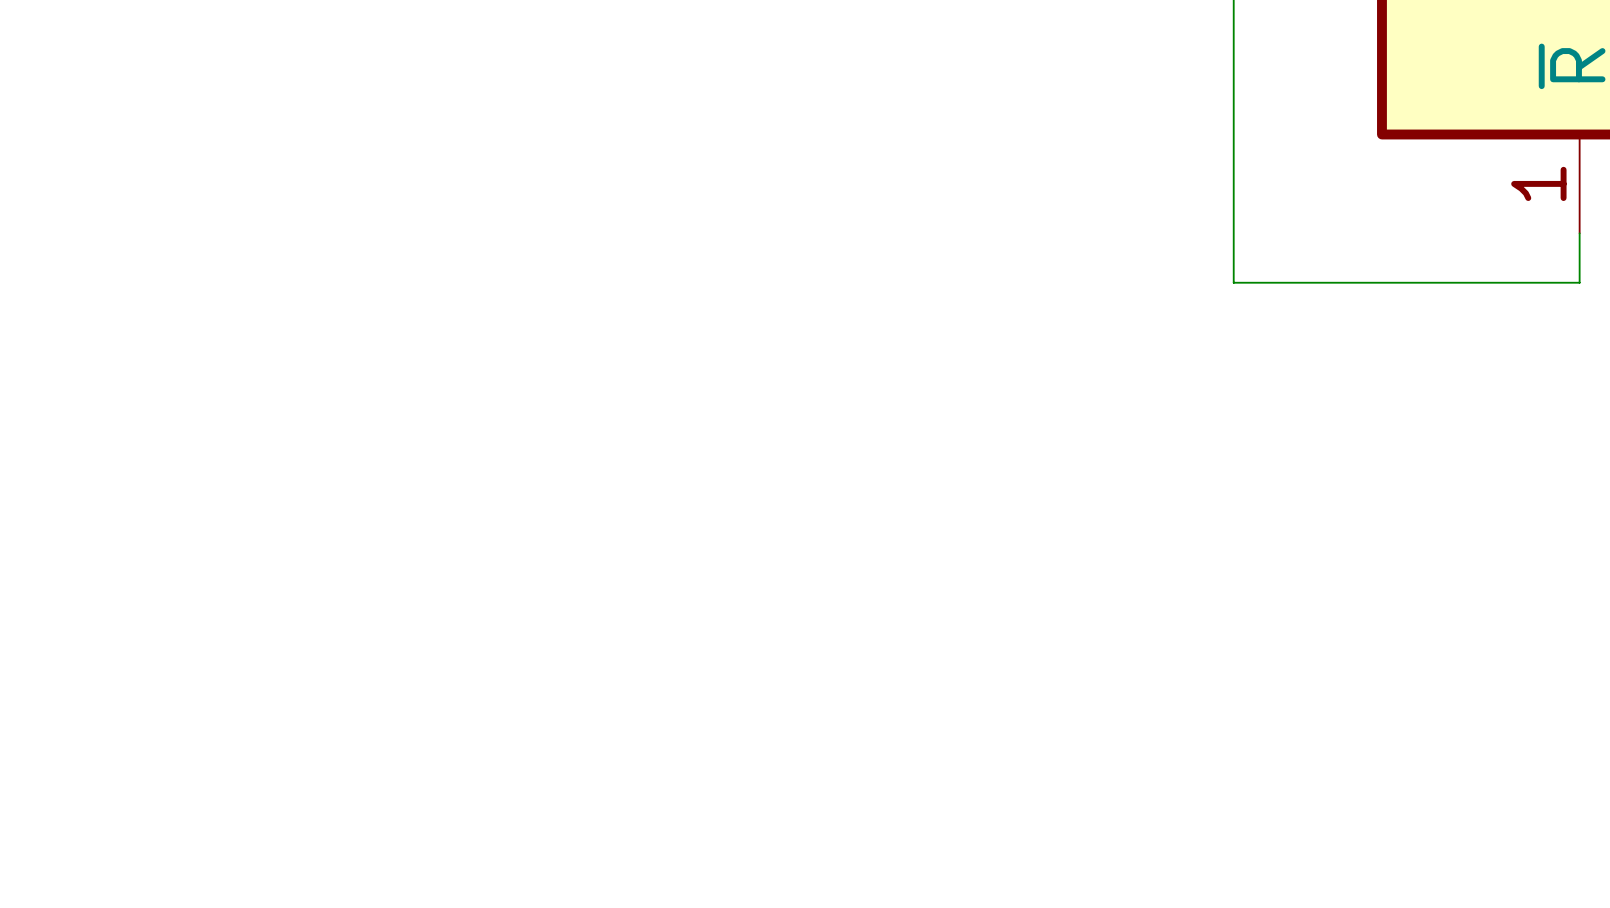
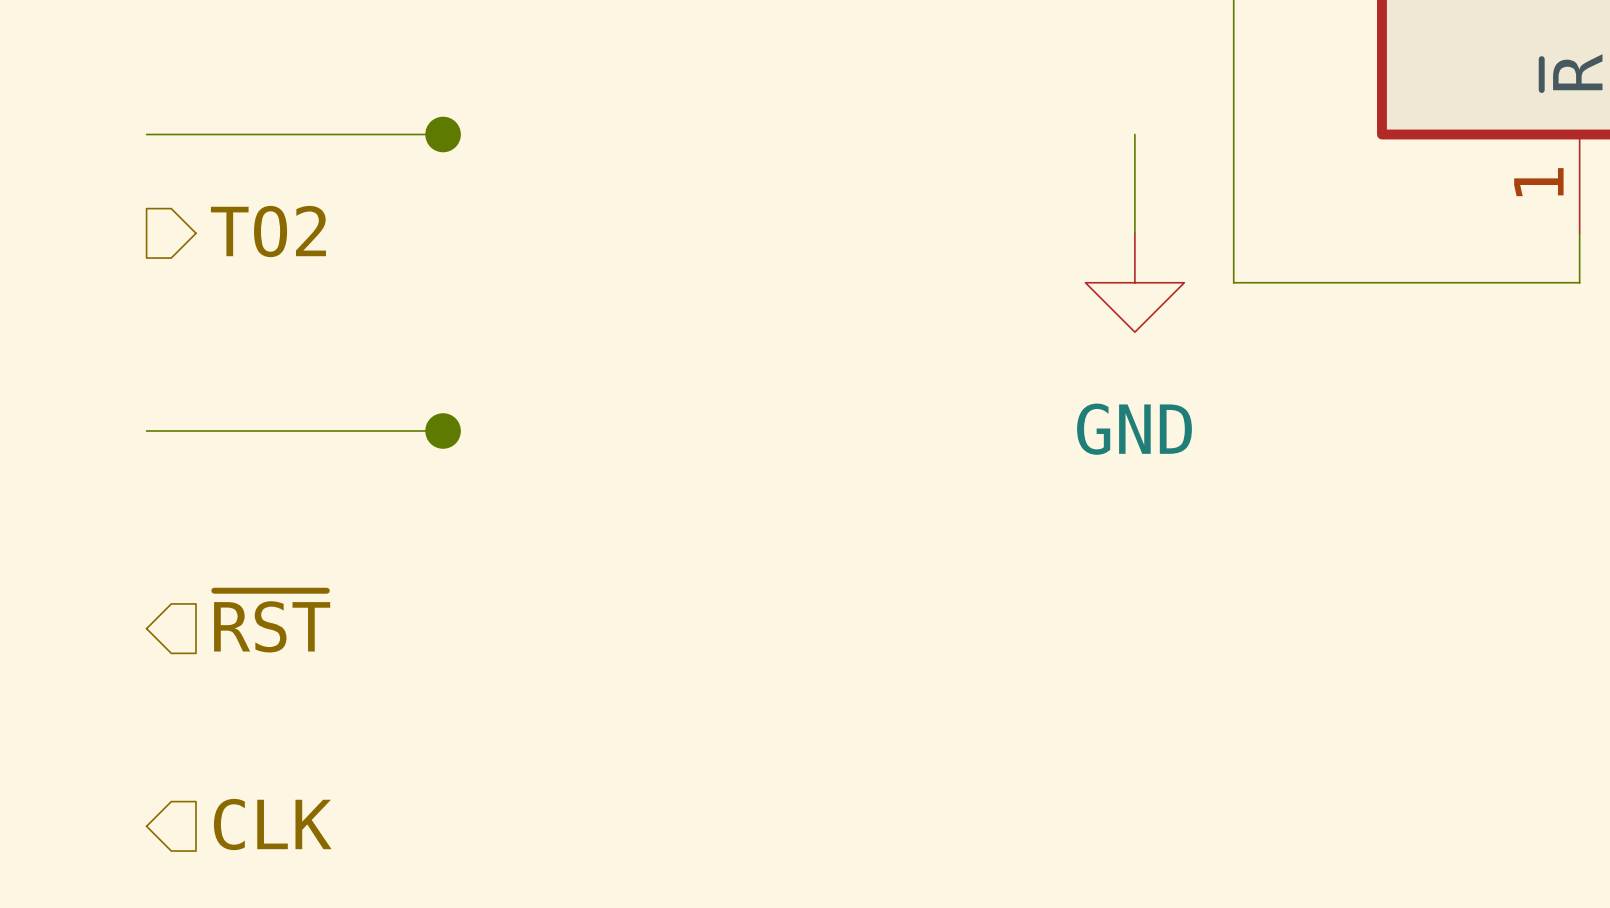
wire: none -> (146, 134) (443, 134)
junction: none -> (443, 134)
wire: none -> (1134, 134) (1134, 233)
hierarchical label: none -> TO2 (268, 231)
power symbol: none -> GND (1134, 282)
wire: none -> (146, 430) (443, 430)
junction: none -> (443, 430)
hierarchical label: none -> ~{RST} (272, 621)
hierarchical label: none -> CLK (272, 824)

